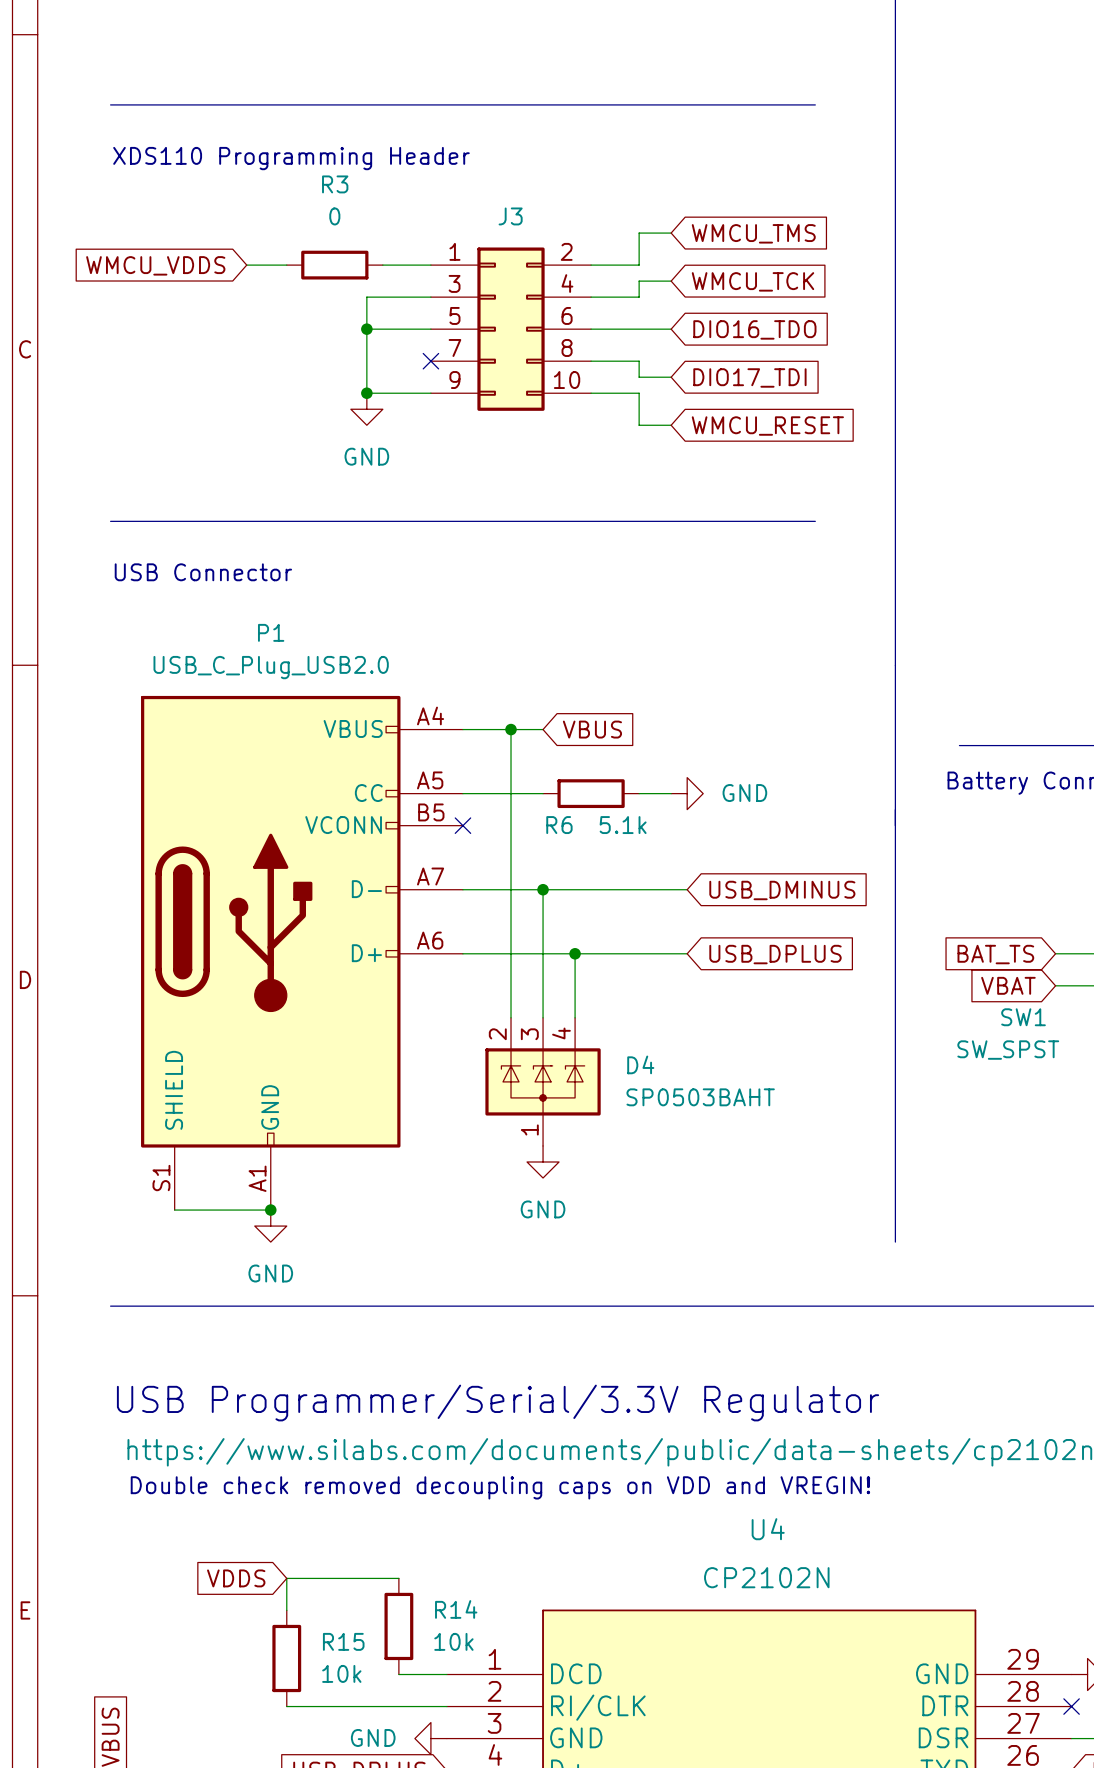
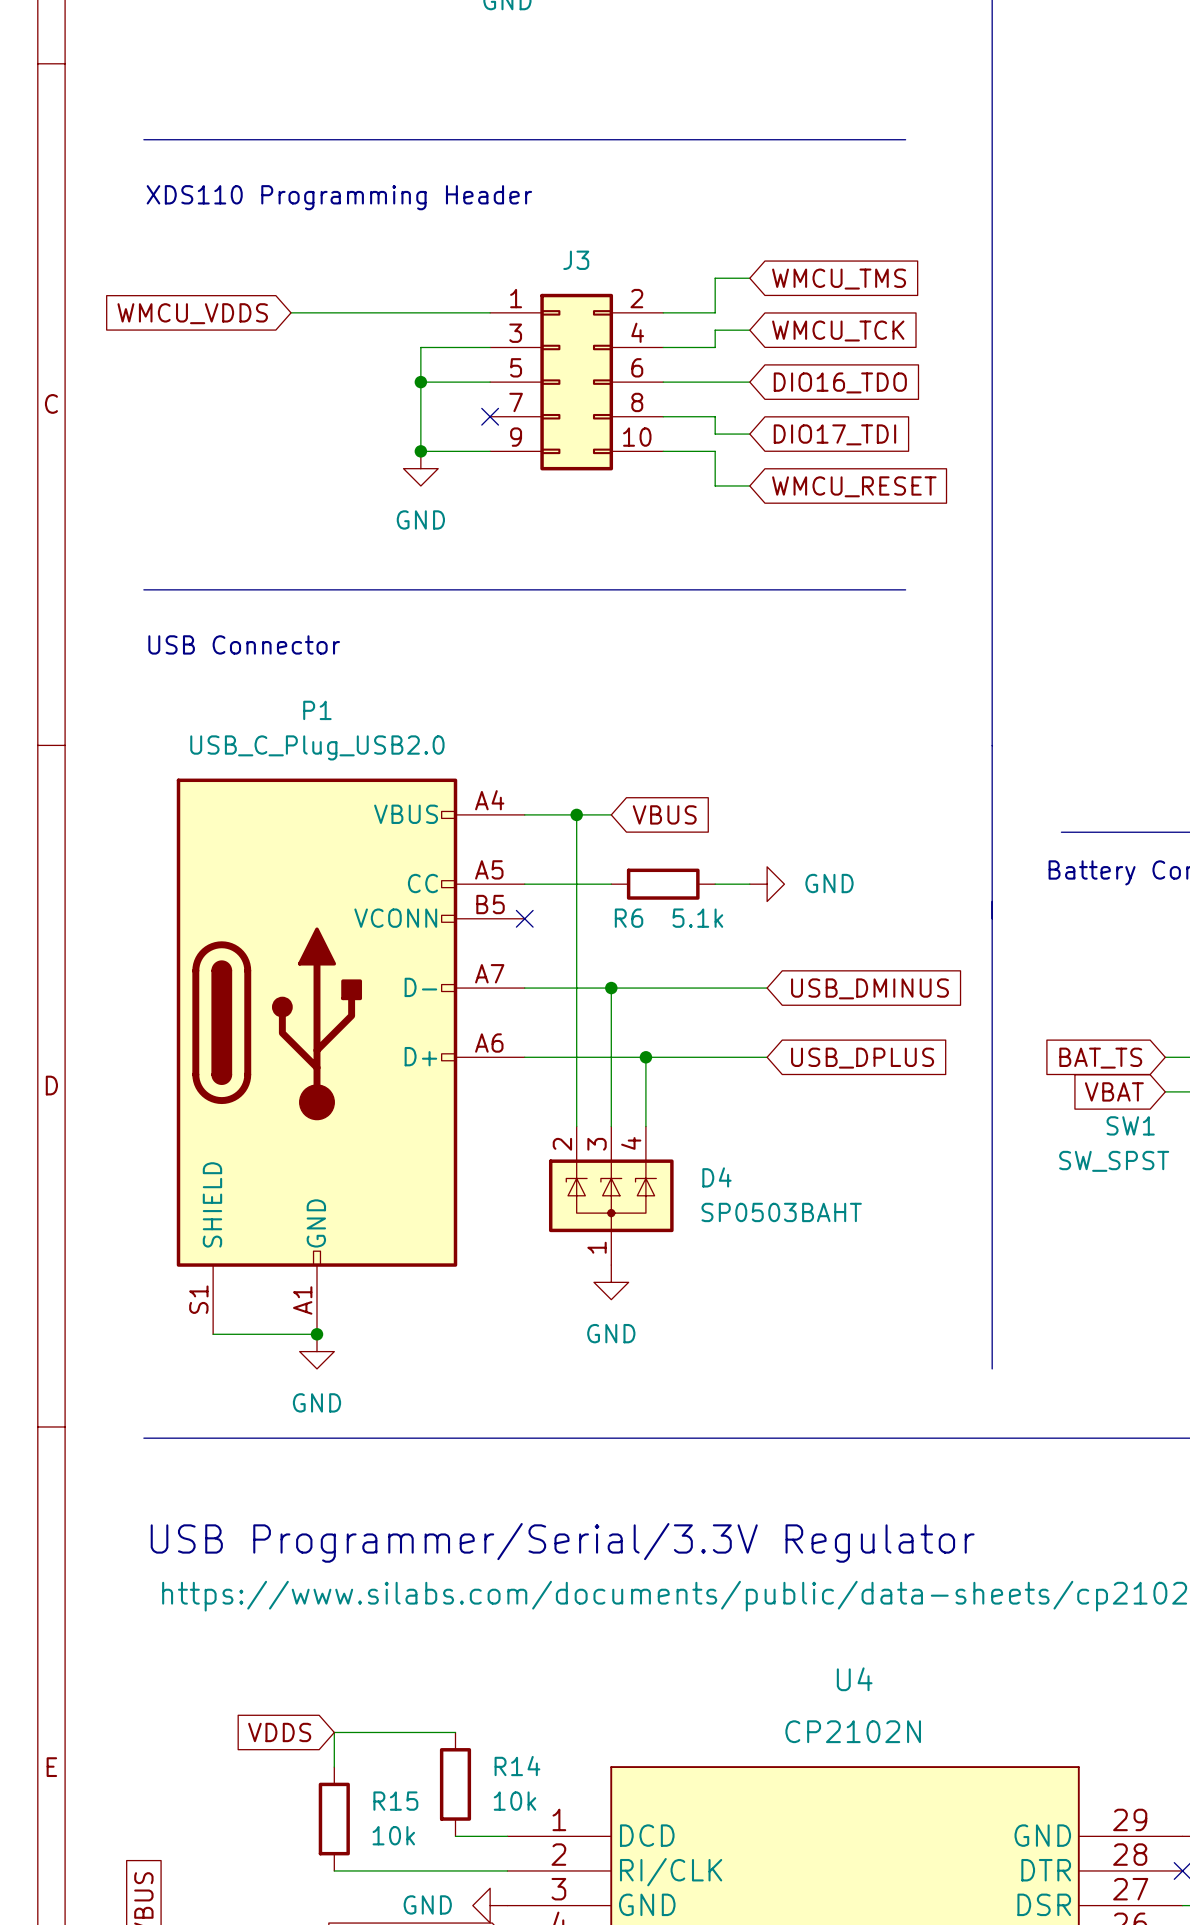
wire: none -> (334, 312) (438, 312)
R3: 0 (334, 265) -> none
text: Double check removed decoupling caps on VDD and VREGIN! (500, 1487) -> none

